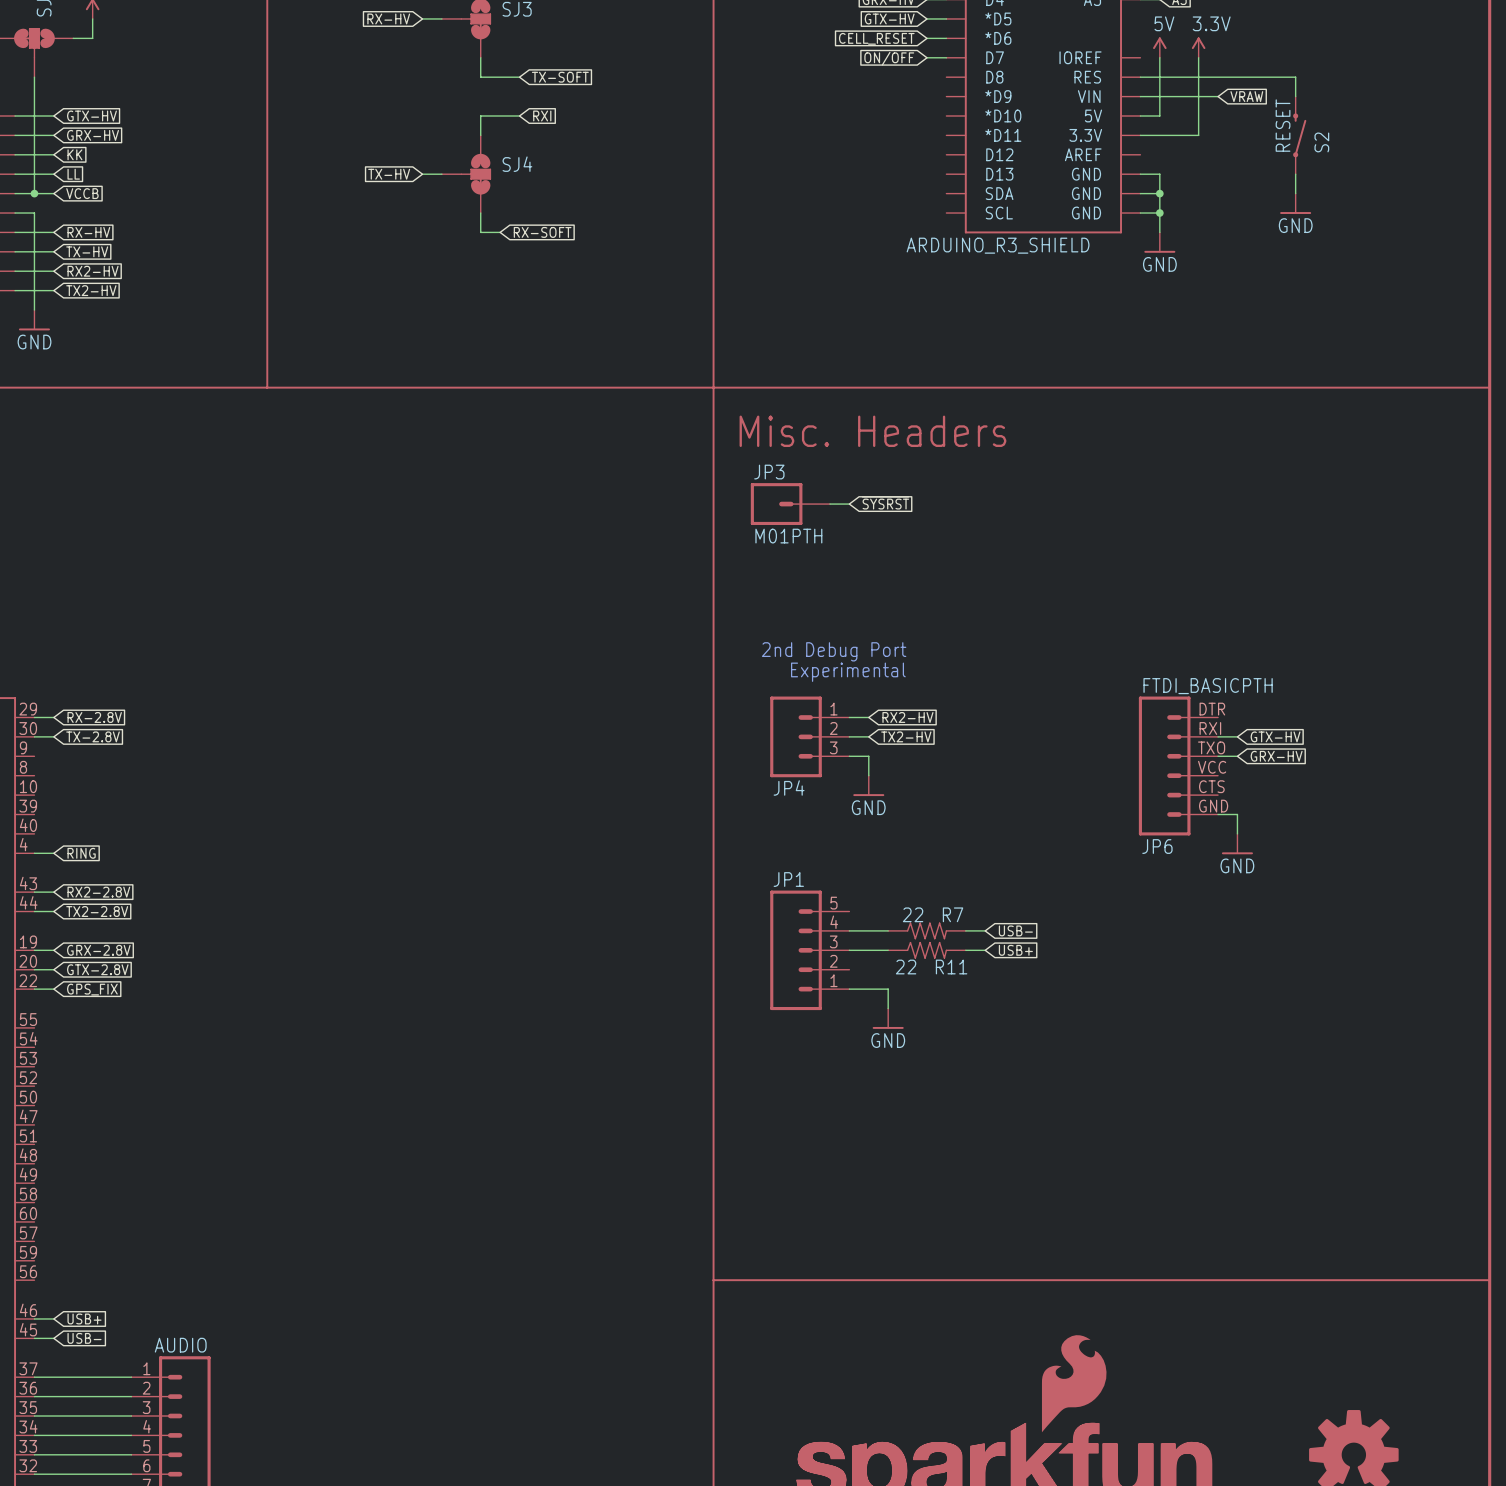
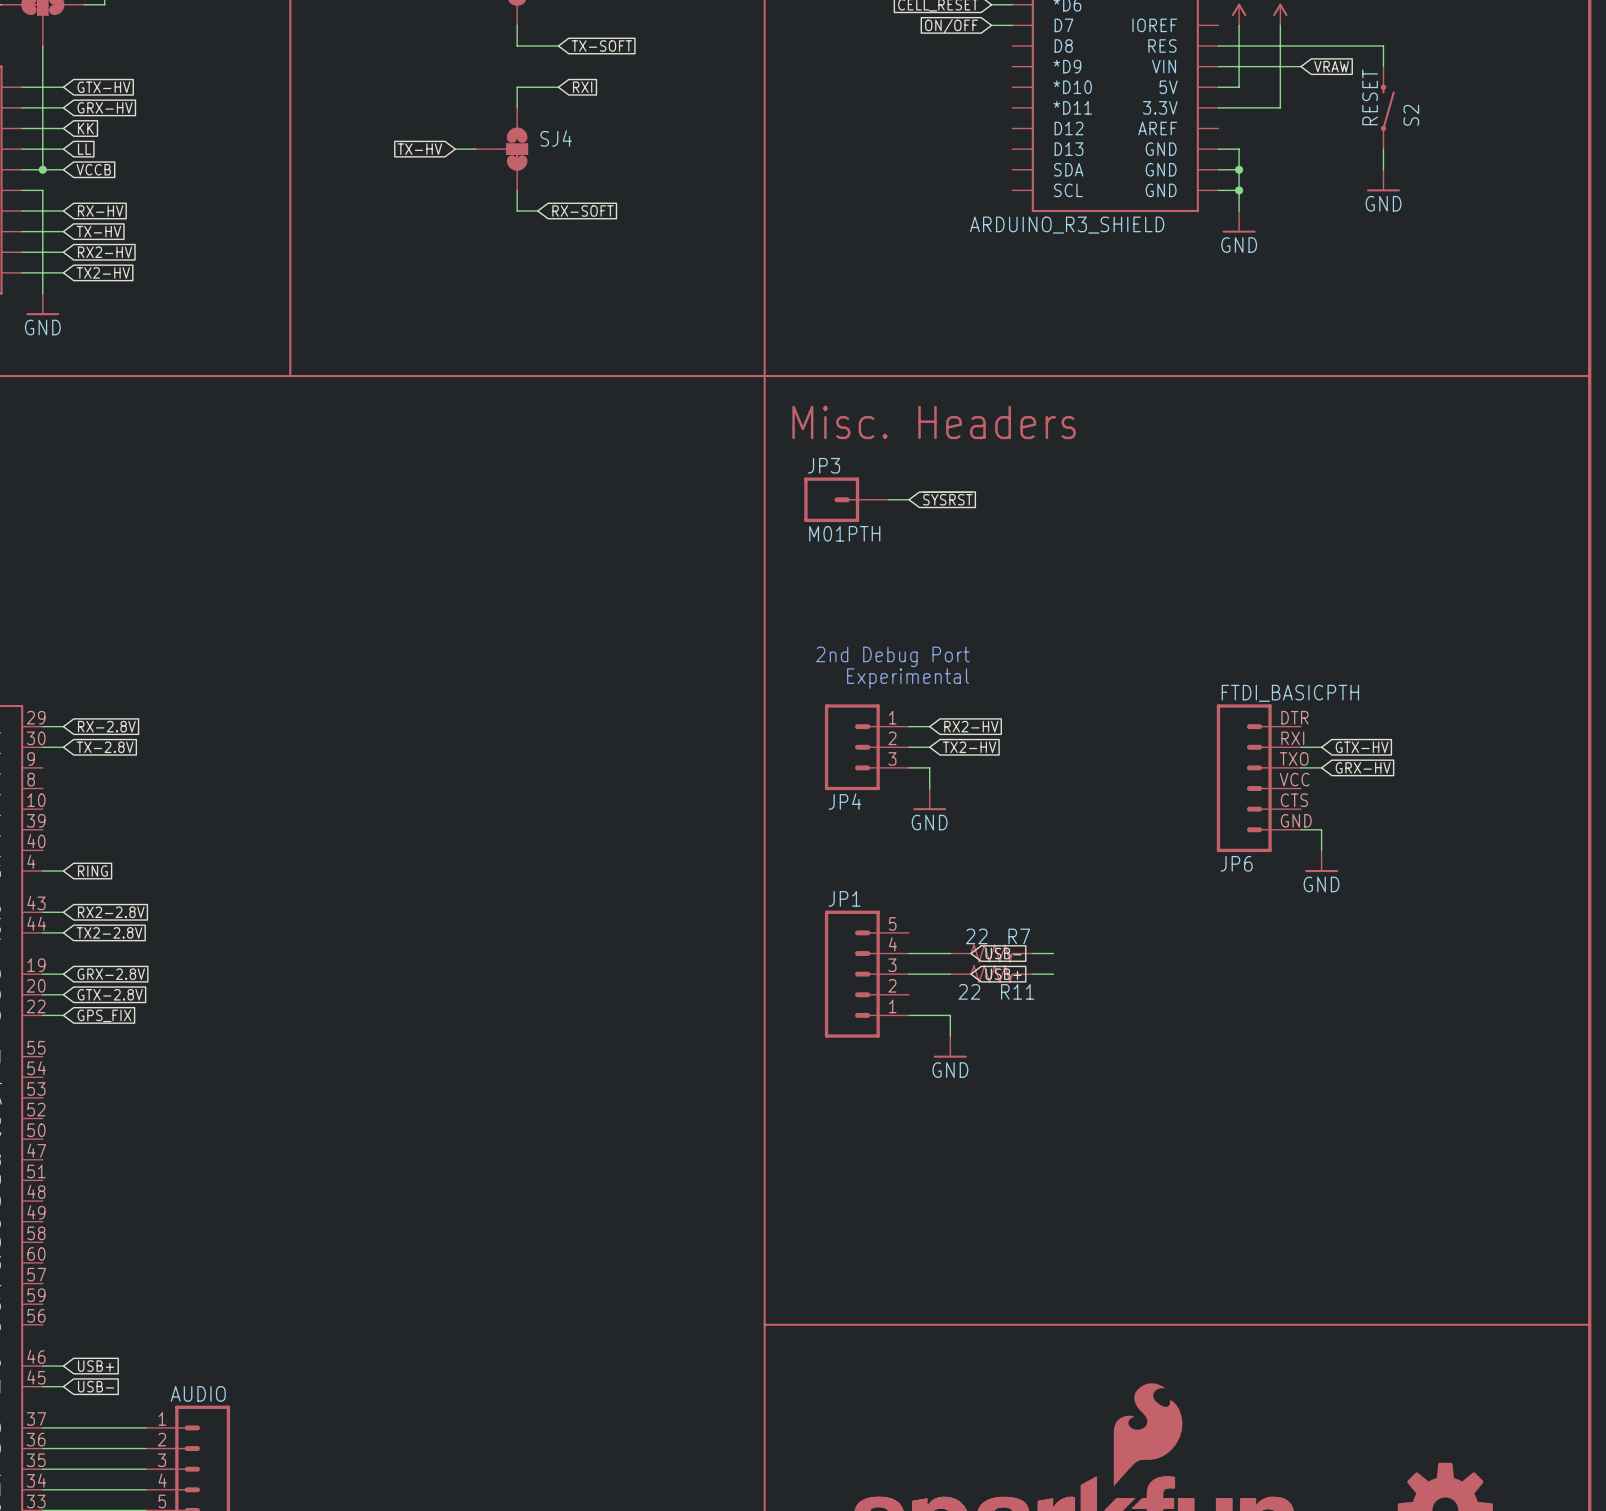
global label position: USB- (1015, 930) -> USB- (1003, 953)
global label position: USB+ (1015, 950) -> USB+ (1003, 974)

